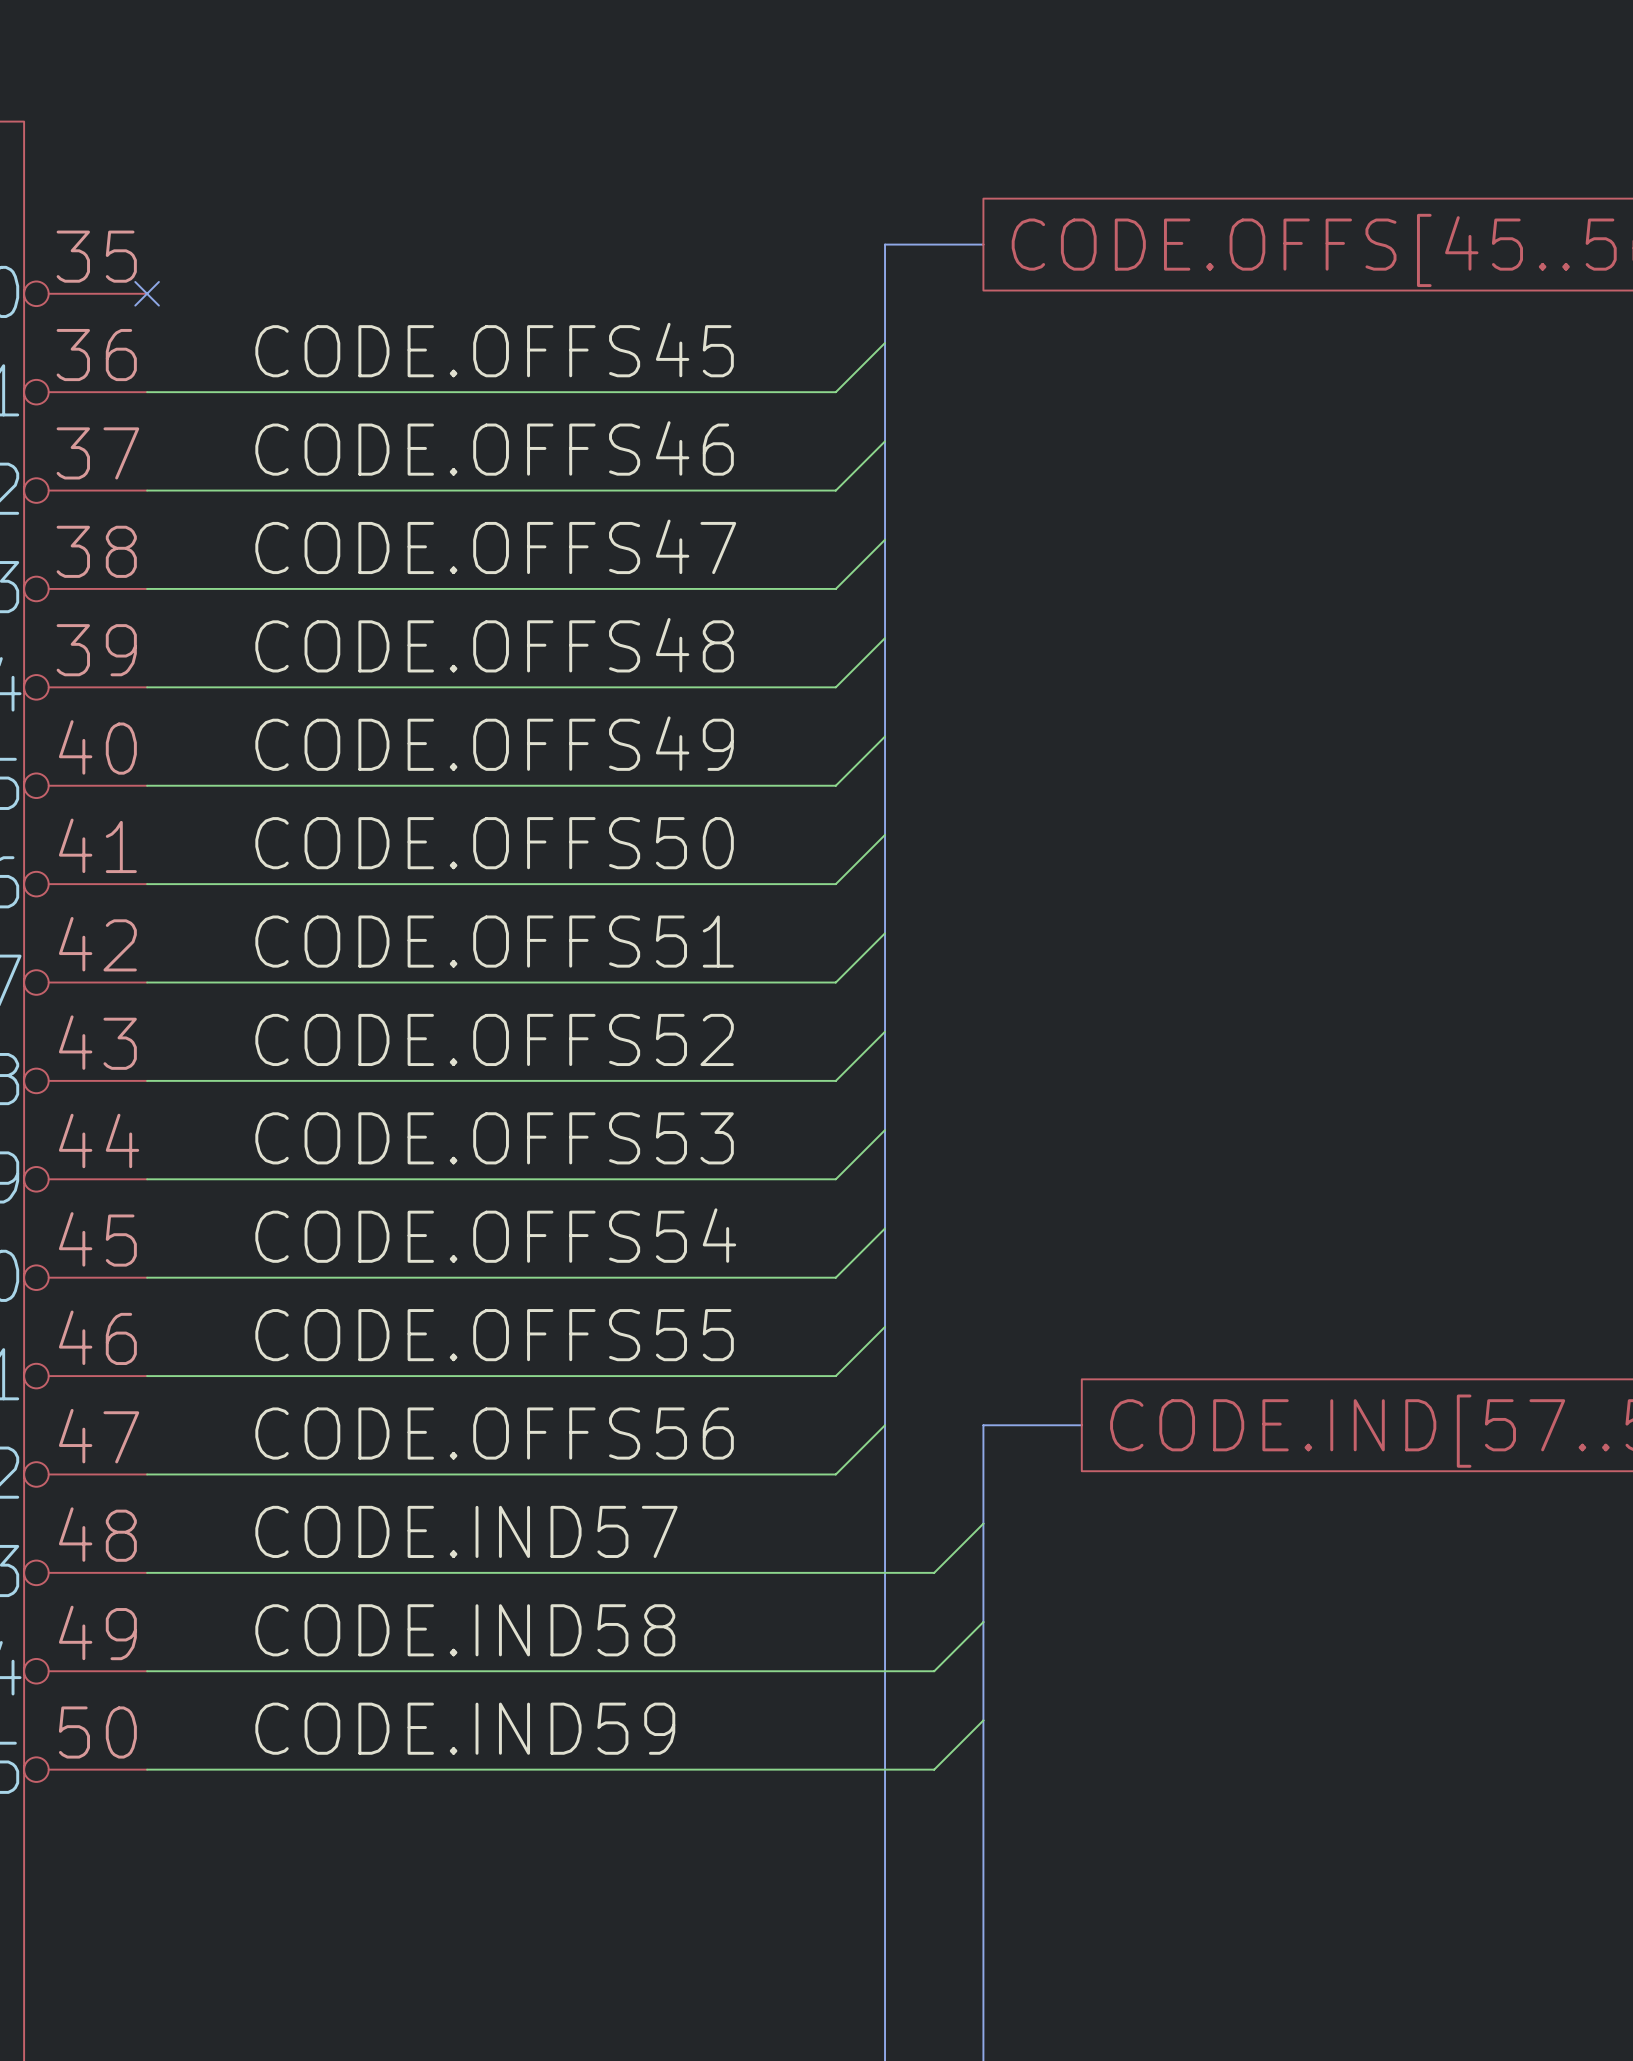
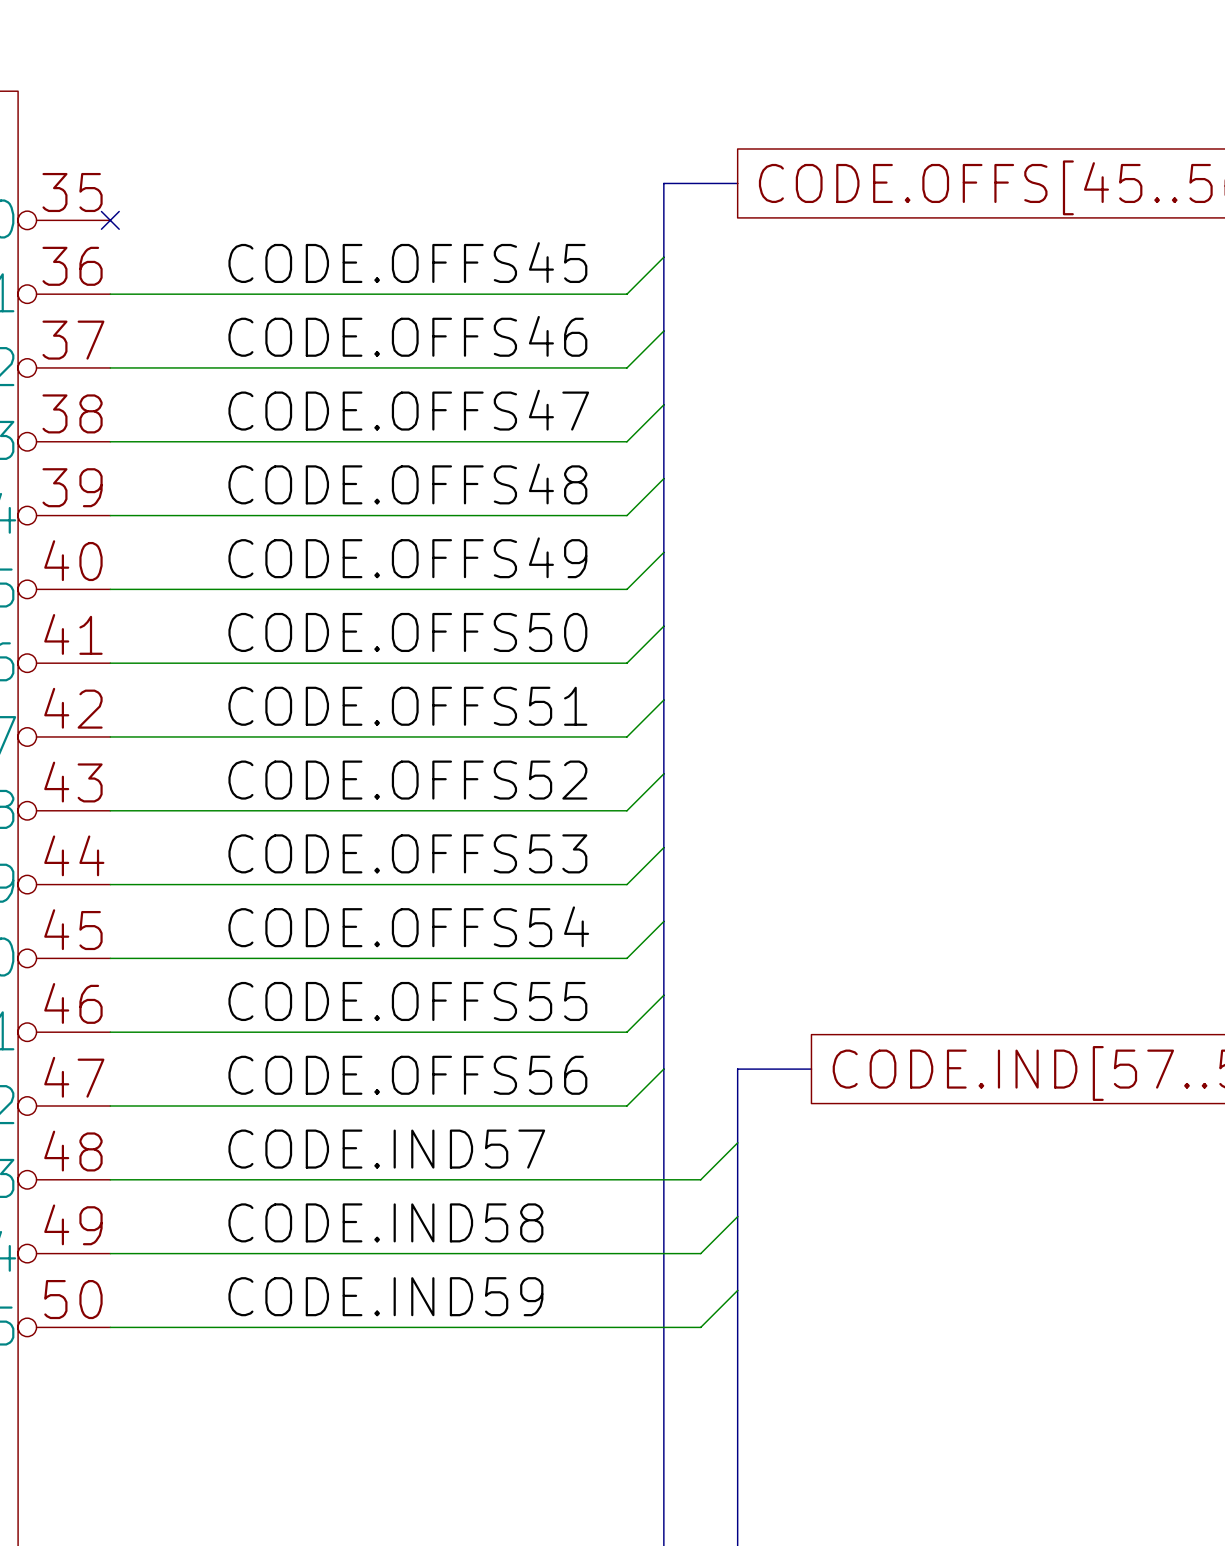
label position: CODE.OFFS45 (494, 350) -> CODE.OFFS45 (407, 262)
label position: CODE.OFFS46 (494, 448) -> CODE.OFFS46 (407, 336)
label position: CODE.OFFS47 (495, 546) -> CODE.OFFS47 (408, 410)
label position: CODE.OFFS48 (494, 645) -> CODE.OFFS48 (407, 483)
label position: CODE.OFFS49 (494, 743) -> CODE.OFFS49 (407, 557)
label position: CODE.OFFS50 (494, 843) -> CODE.OFFS50 (407, 632)
label position: CODE.OFFS51 (494, 941) -> CODE.OFFS51 (407, 706)
label position: CODE.OFFS52 (494, 1039) -> CODE.OFFS52 (407, 780)
label position: CODE.OFFS53 (494, 1138) -> CODE.OFFS53 (407, 853)
label position: CODE.OFFS54 (495, 1235) -> CODE.OFFS54 (408, 926)
label position: CODE.OFFS55 (494, 1335) -> CODE.OFFS55 (407, 1001)
label position: CODE.OFFS56 (494, 1433) -> CODE.OFFS56 (407, 1075)
label position: CODE.IND57 (466, 1531) -> CODE.IND57 (386, 1149)
label position: CODE.IND58 (465, 1630) -> CODE.IND58 (385, 1222)
label position: CODE.IND59 (465, 1728) -> CODE.IND59 (385, 1296)

